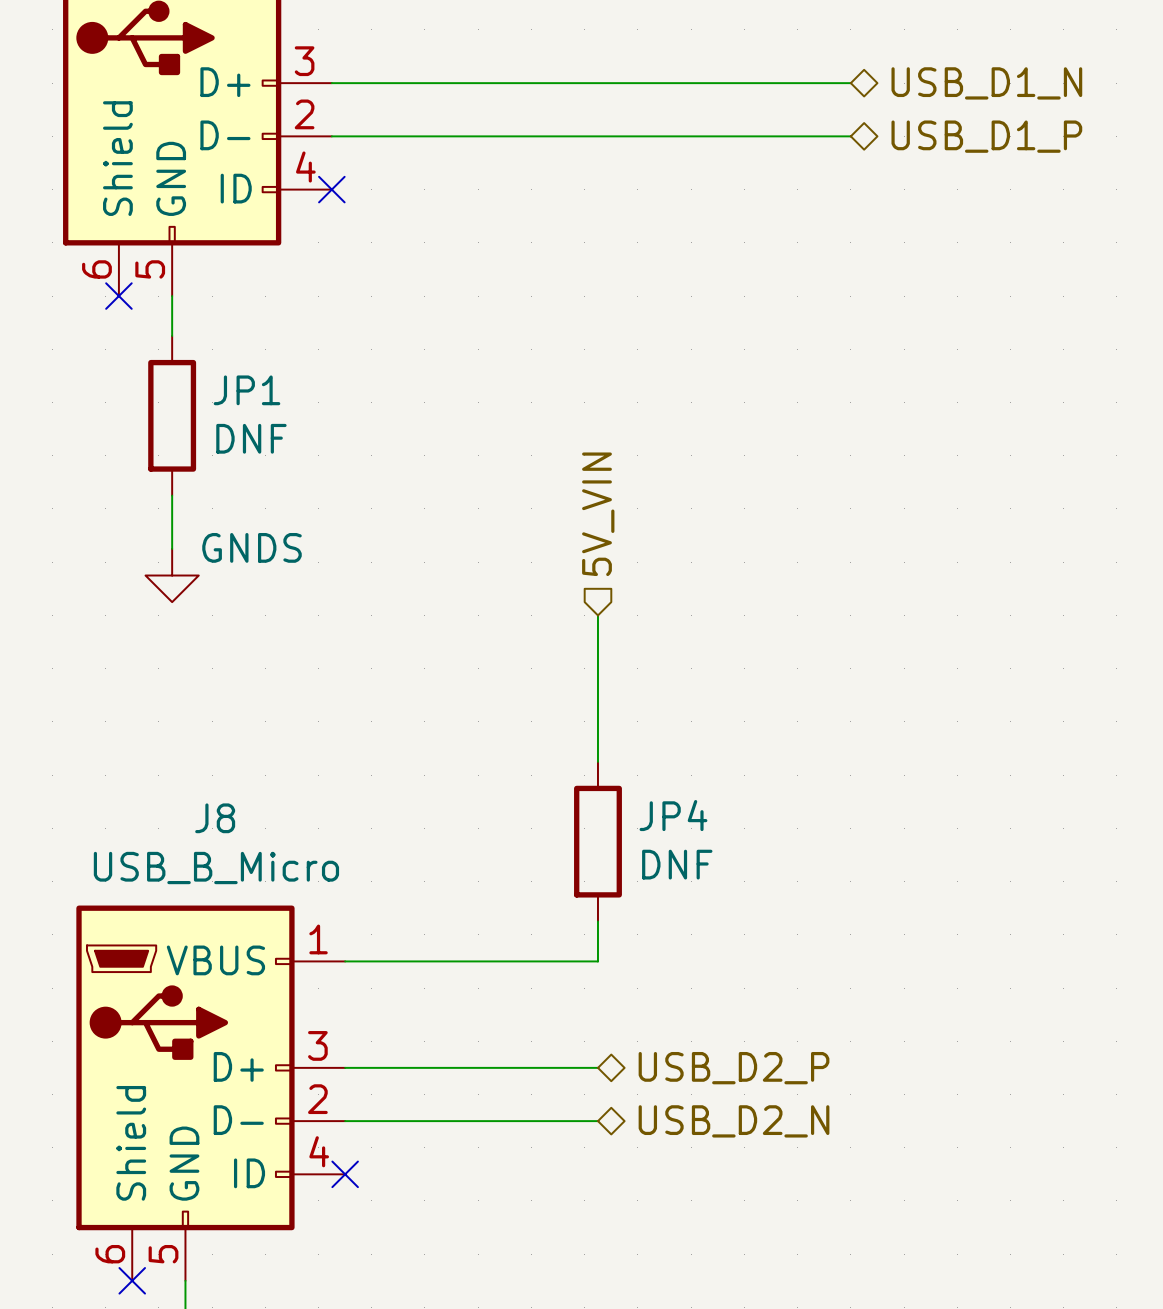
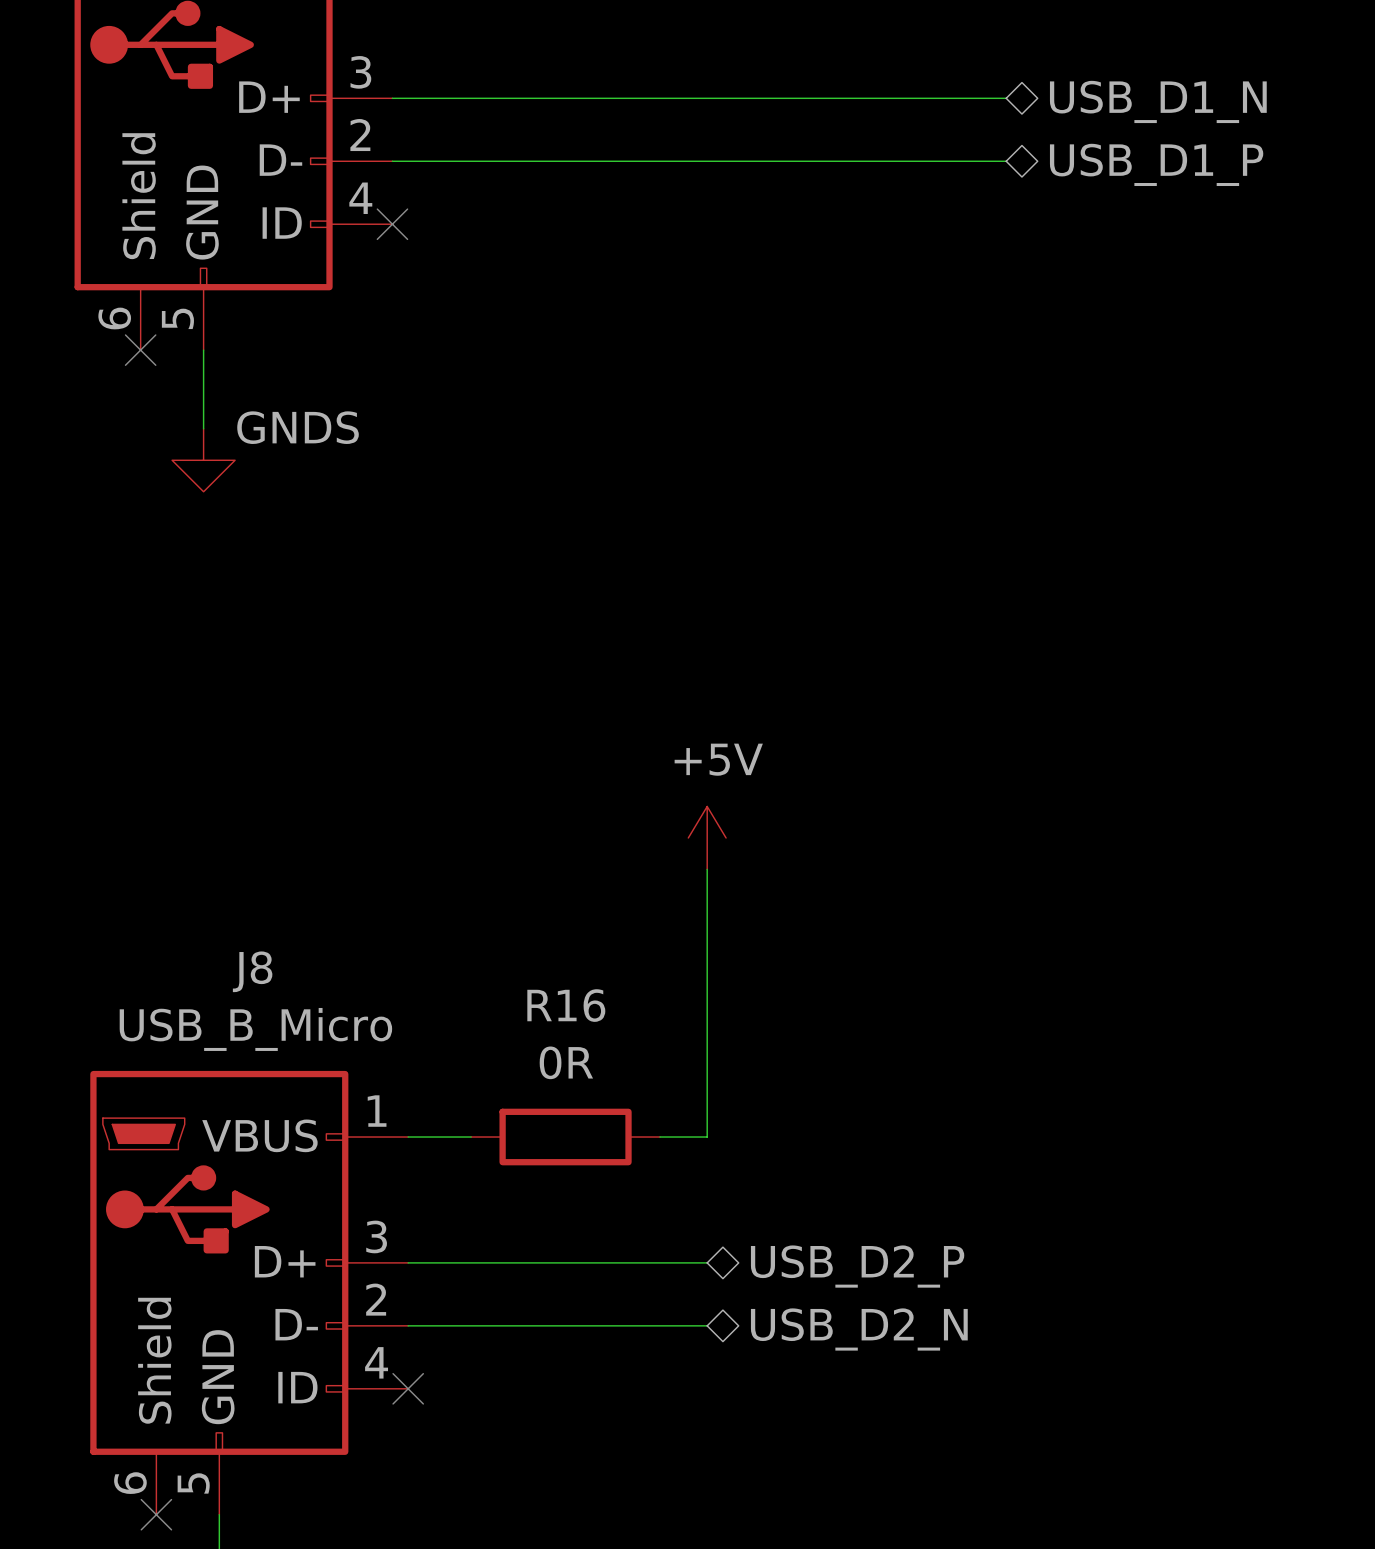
JP1: DNF (172, 415) -> none
wire: (172, 495) (172, 548) -> none
hierarchical label: 5V_VIN (598, 514) -> none
power symbol position: GNDS (172, 575) -> GNDS (203, 460)
wire: (597, 615) (597, 735) -> none
power symbol: none -> +5V (707, 837)
wire: none -> (707, 900) (707, 1089)
JP4: DNF (597, 841) -> none
wire: (398, 961) (558, 961) -> none
R16: none -> 0R (565, 1137)

